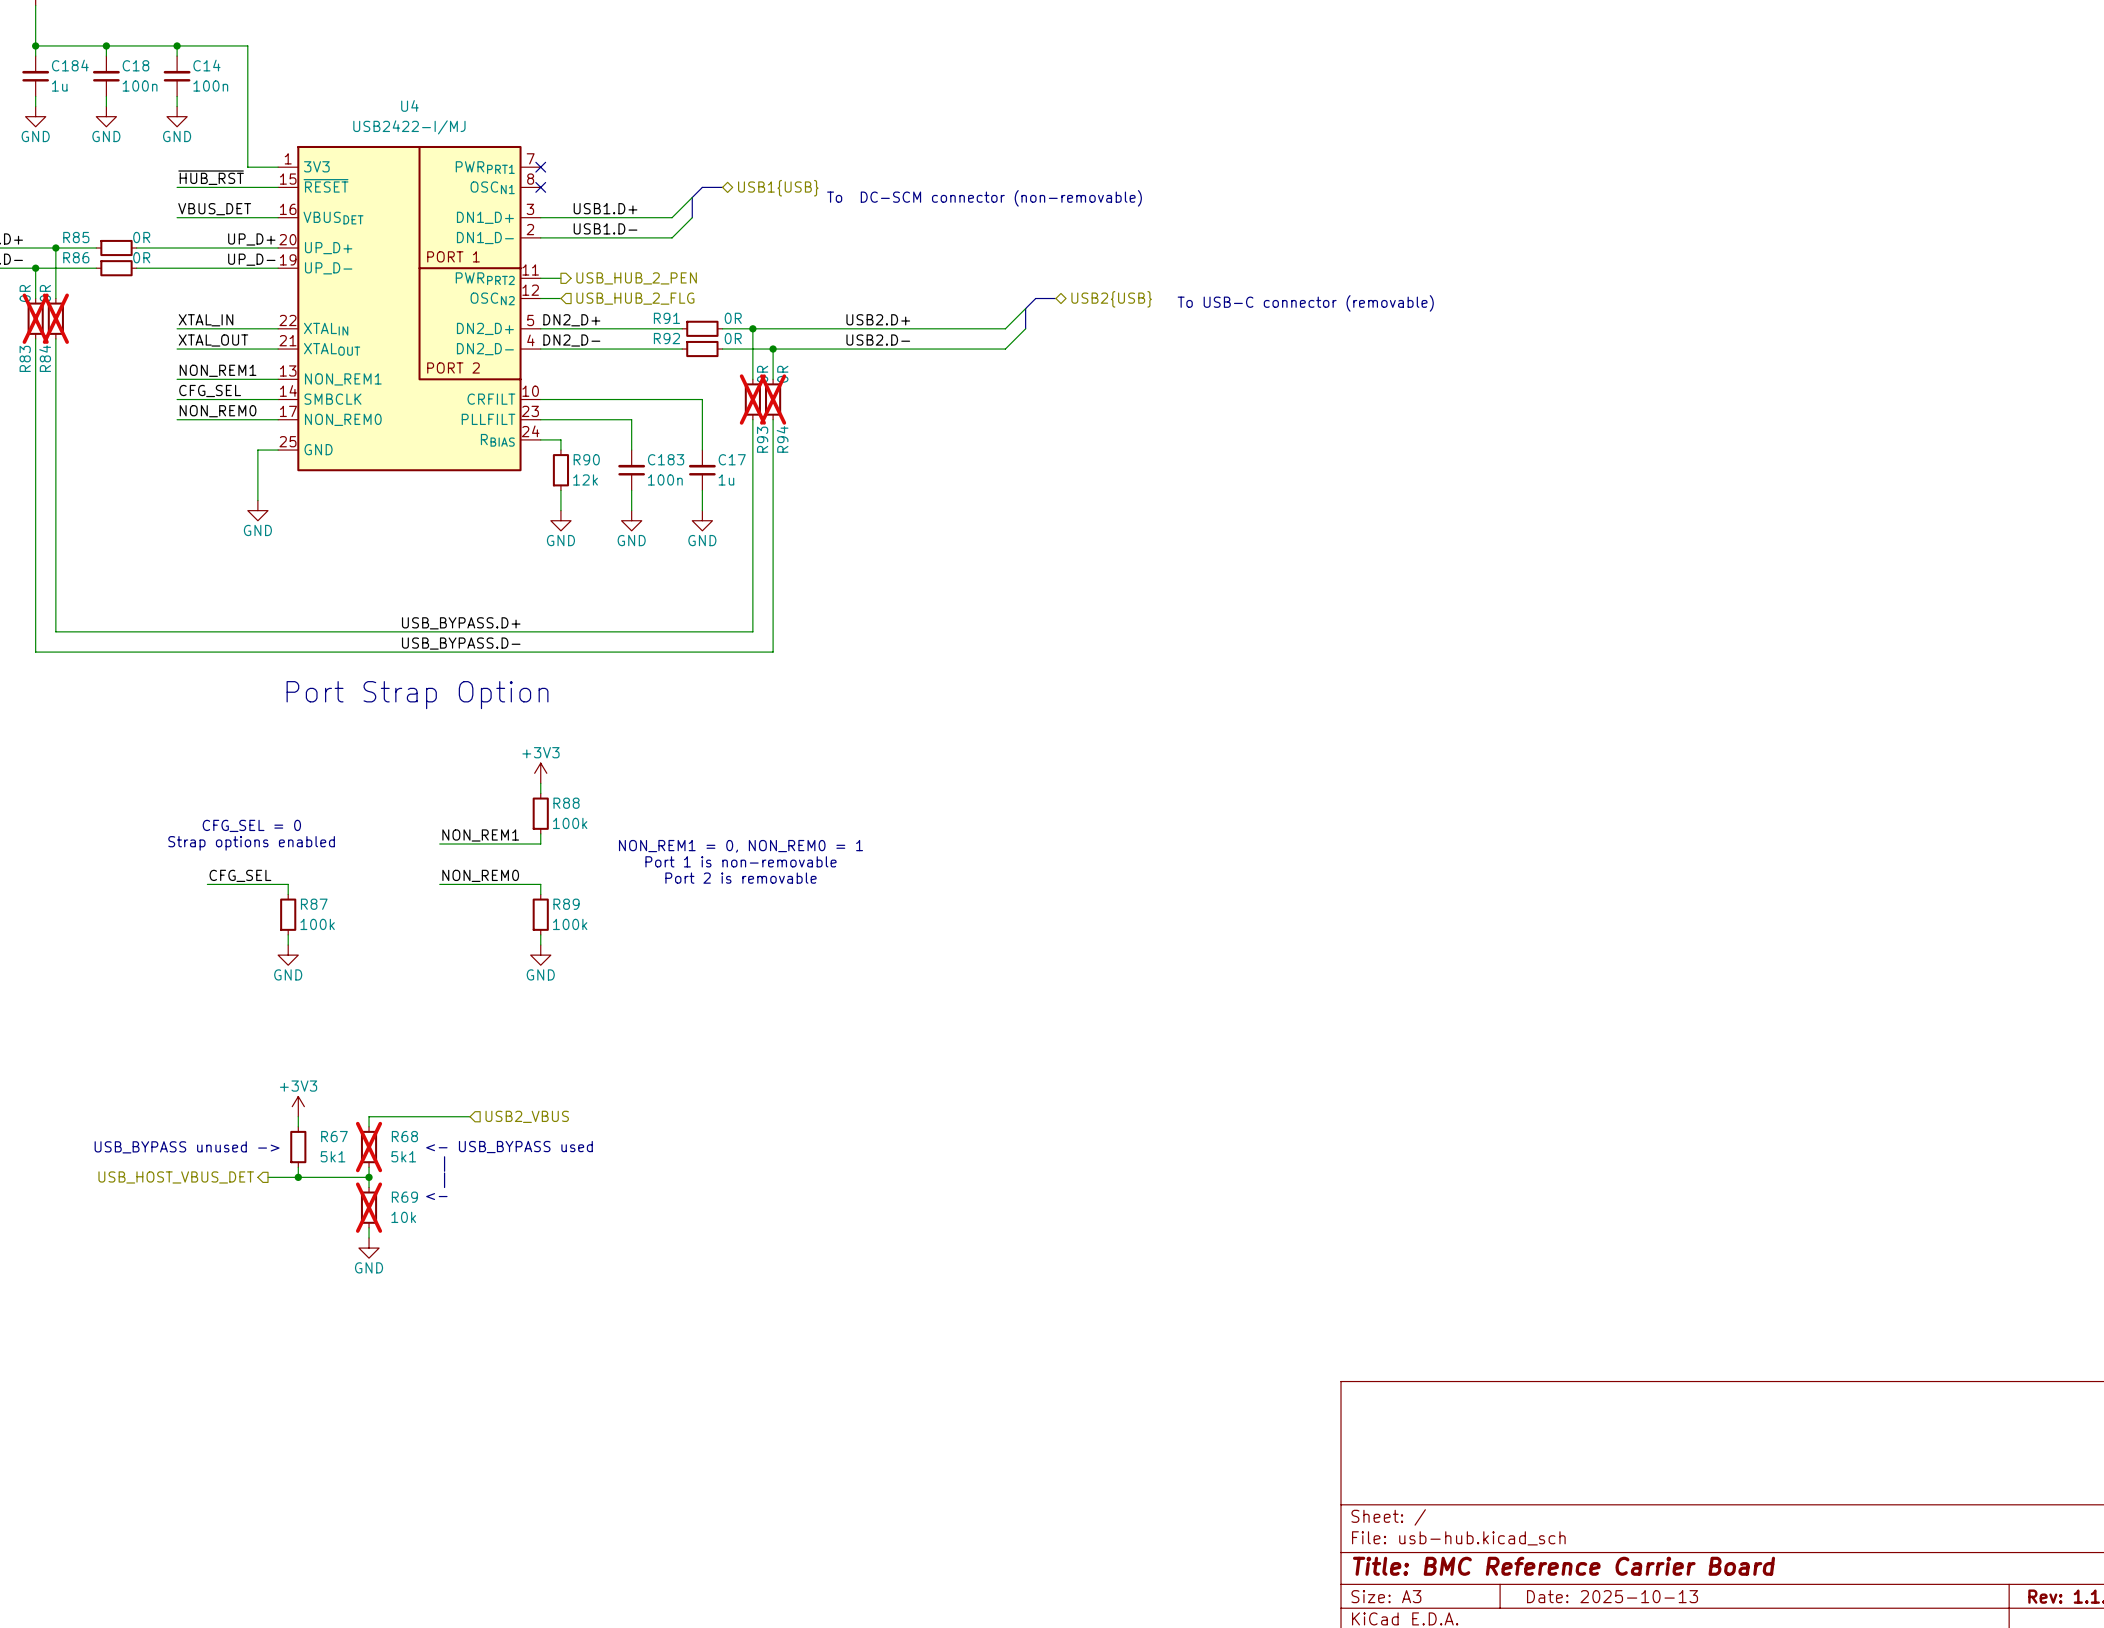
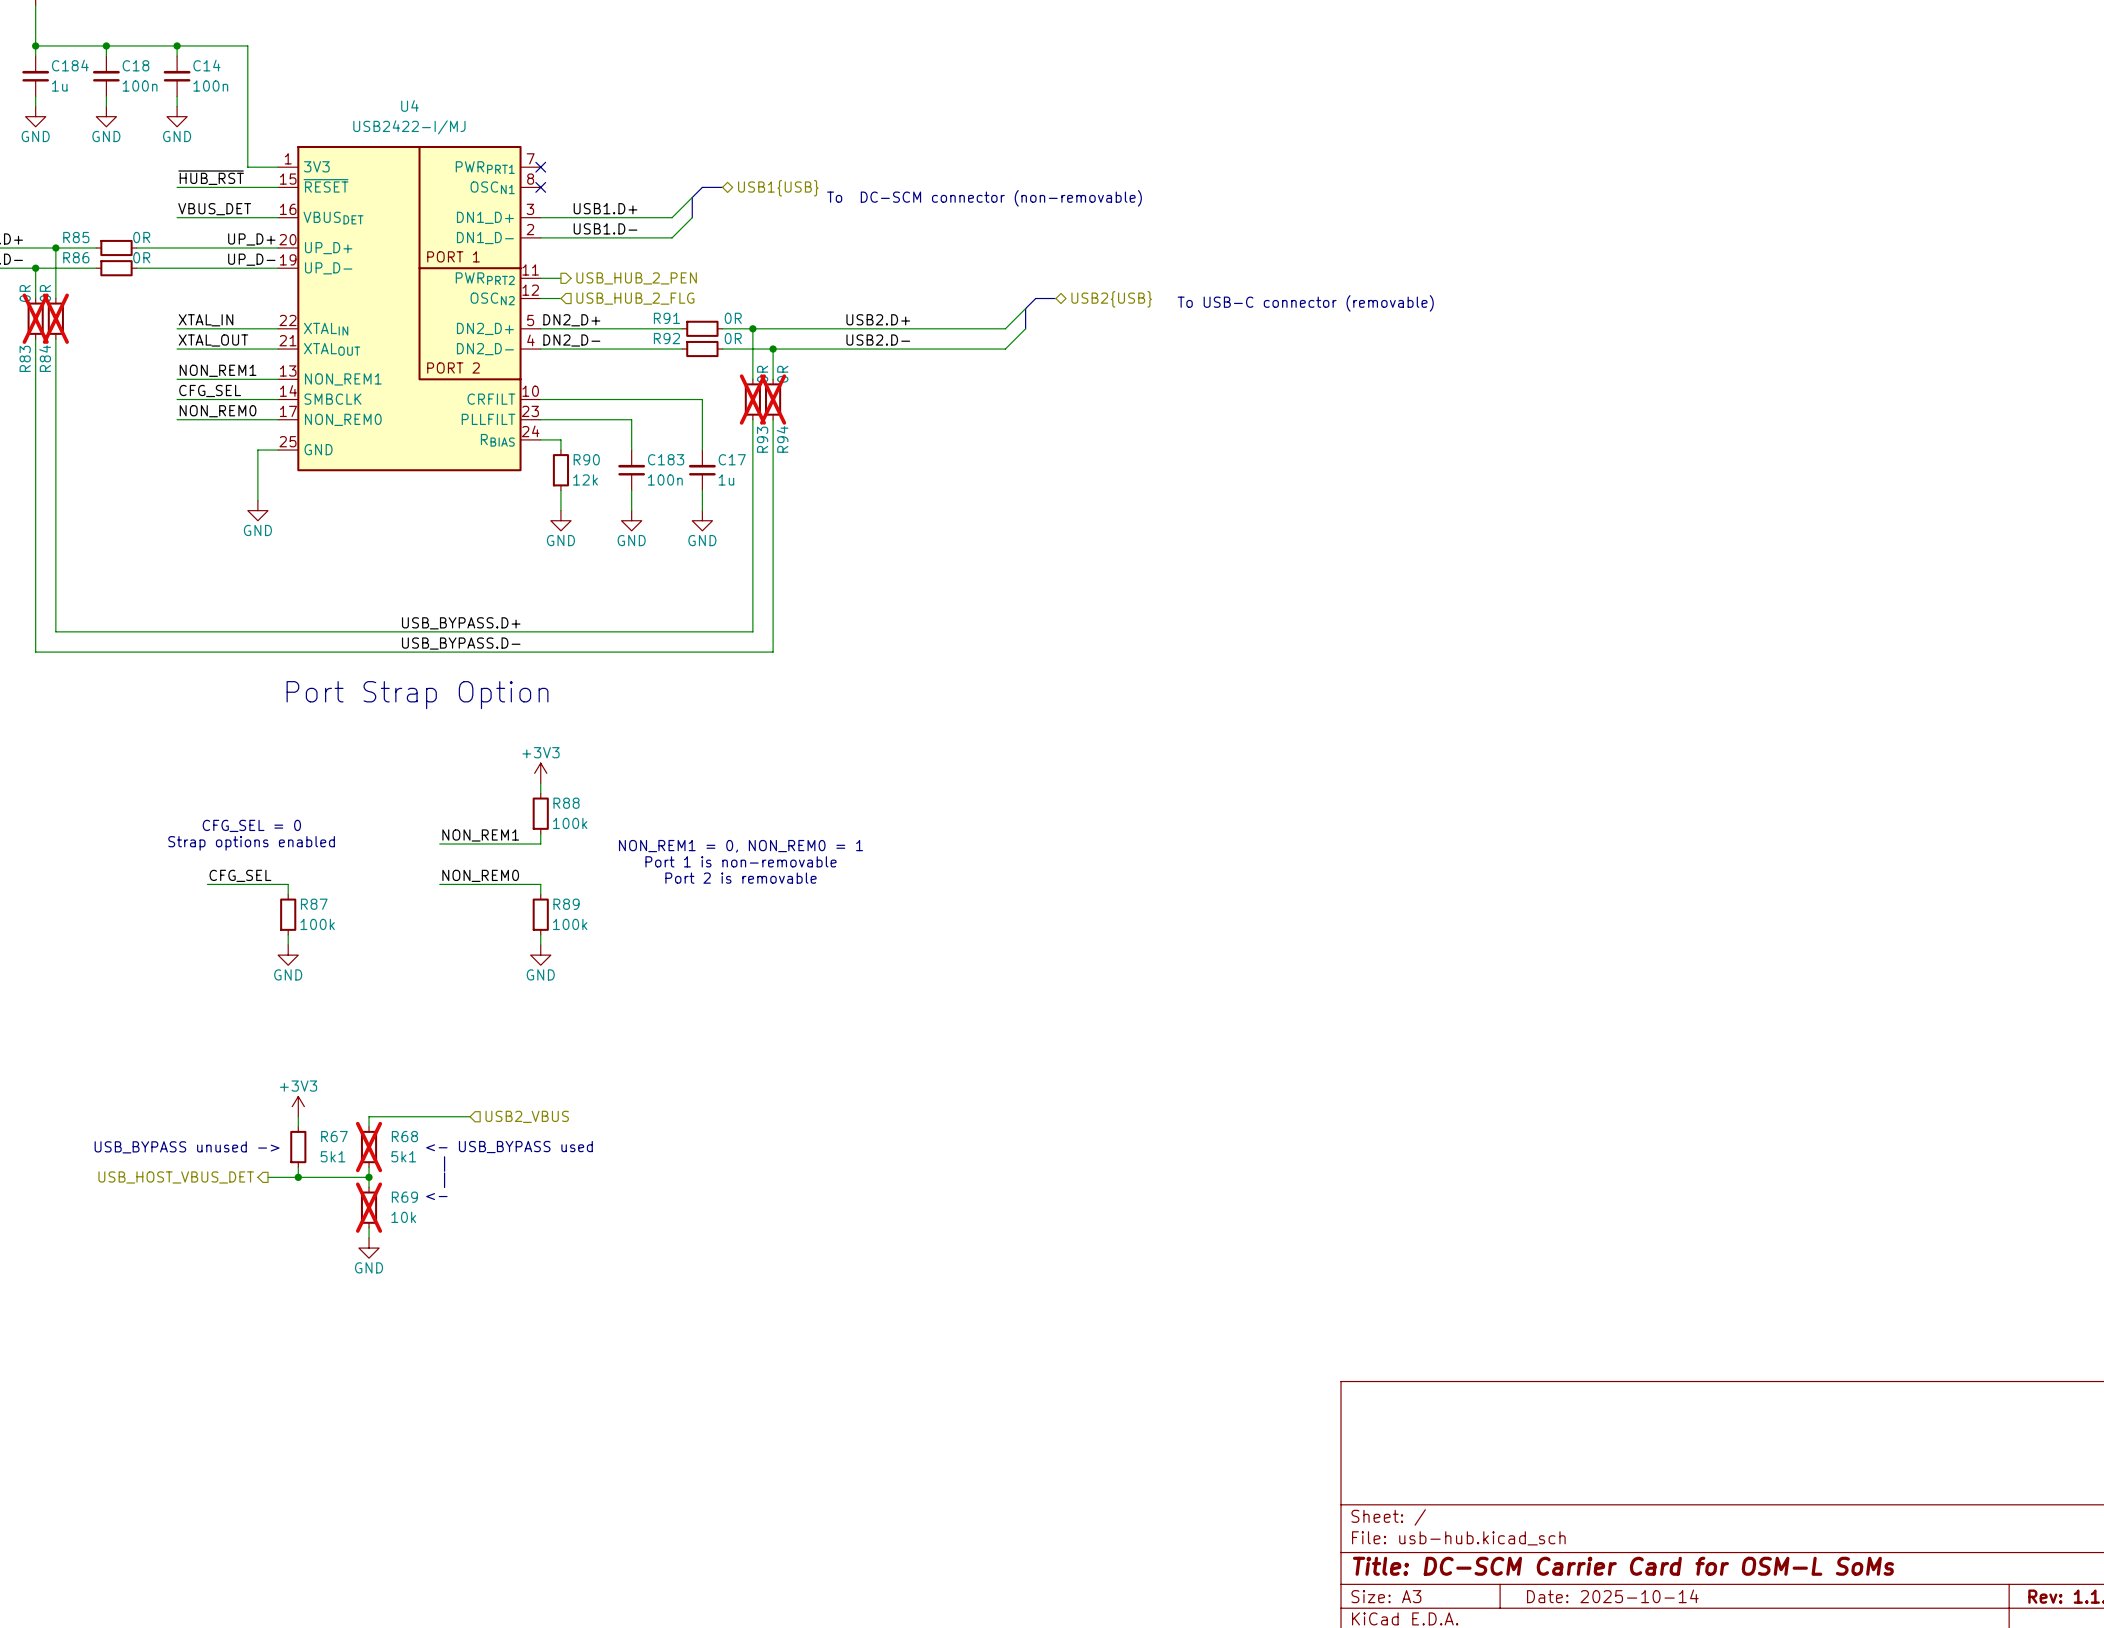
title block: Title: BMC Reference Carrier Board (1564, 1566) -> Title: DC-SCM Carrier Card for OSM-L SoMs (1623, 1566)
title block: Date: 2025-10-13 (1612, 1596) -> Date: 2025-10-14 (1612, 1596)

